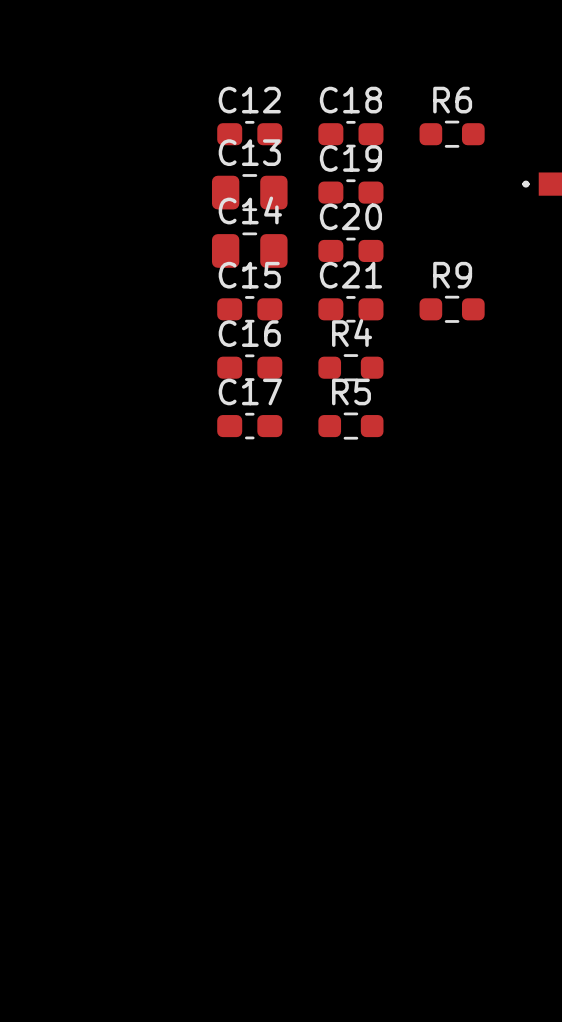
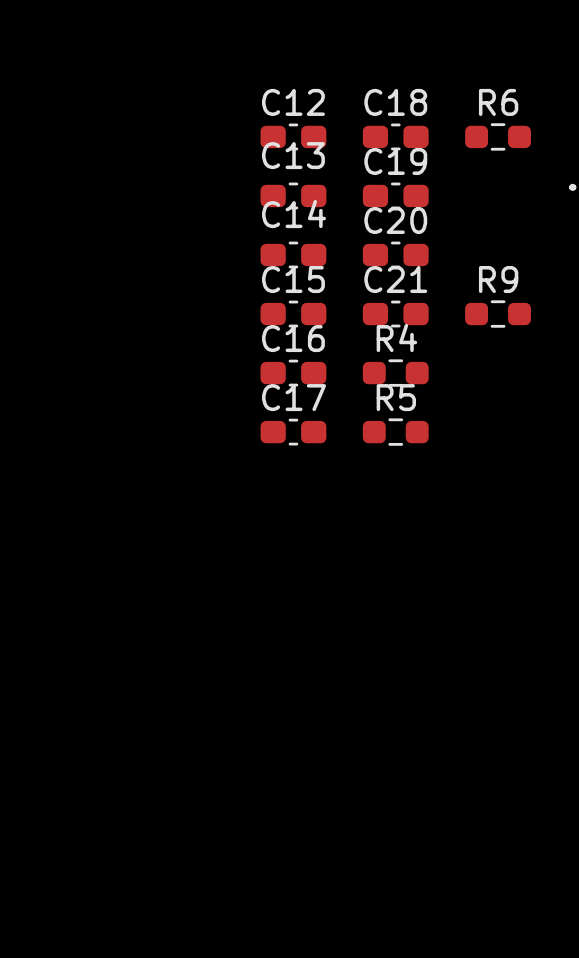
C13 footprint: [211, 174, 288, 212] -> [260, 182, 327, 210]
C14 footprint: [211, 232, 288, 270] -> [260, 241, 327, 269]

